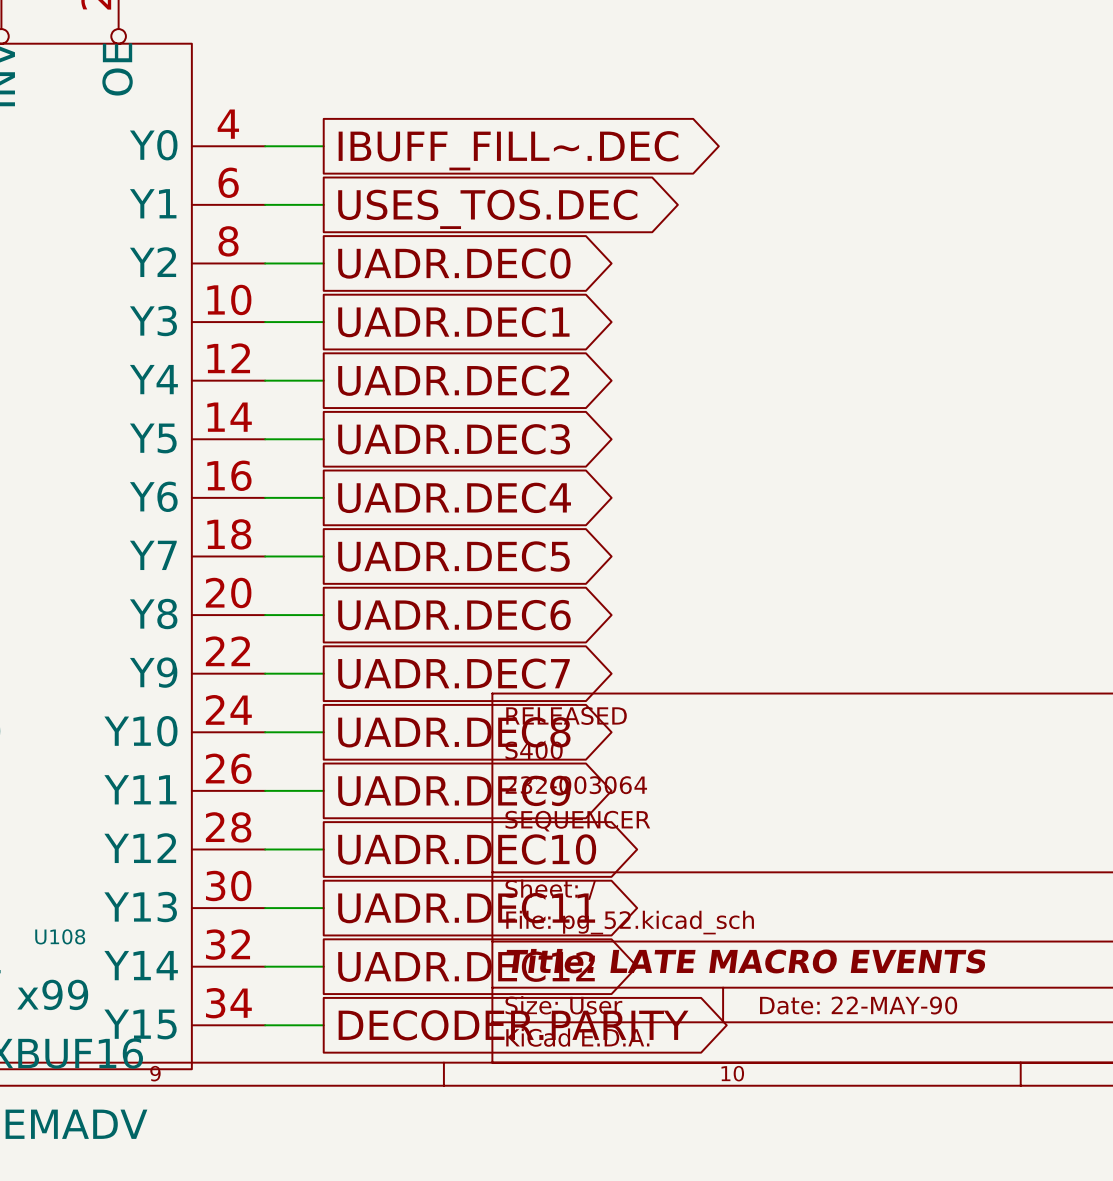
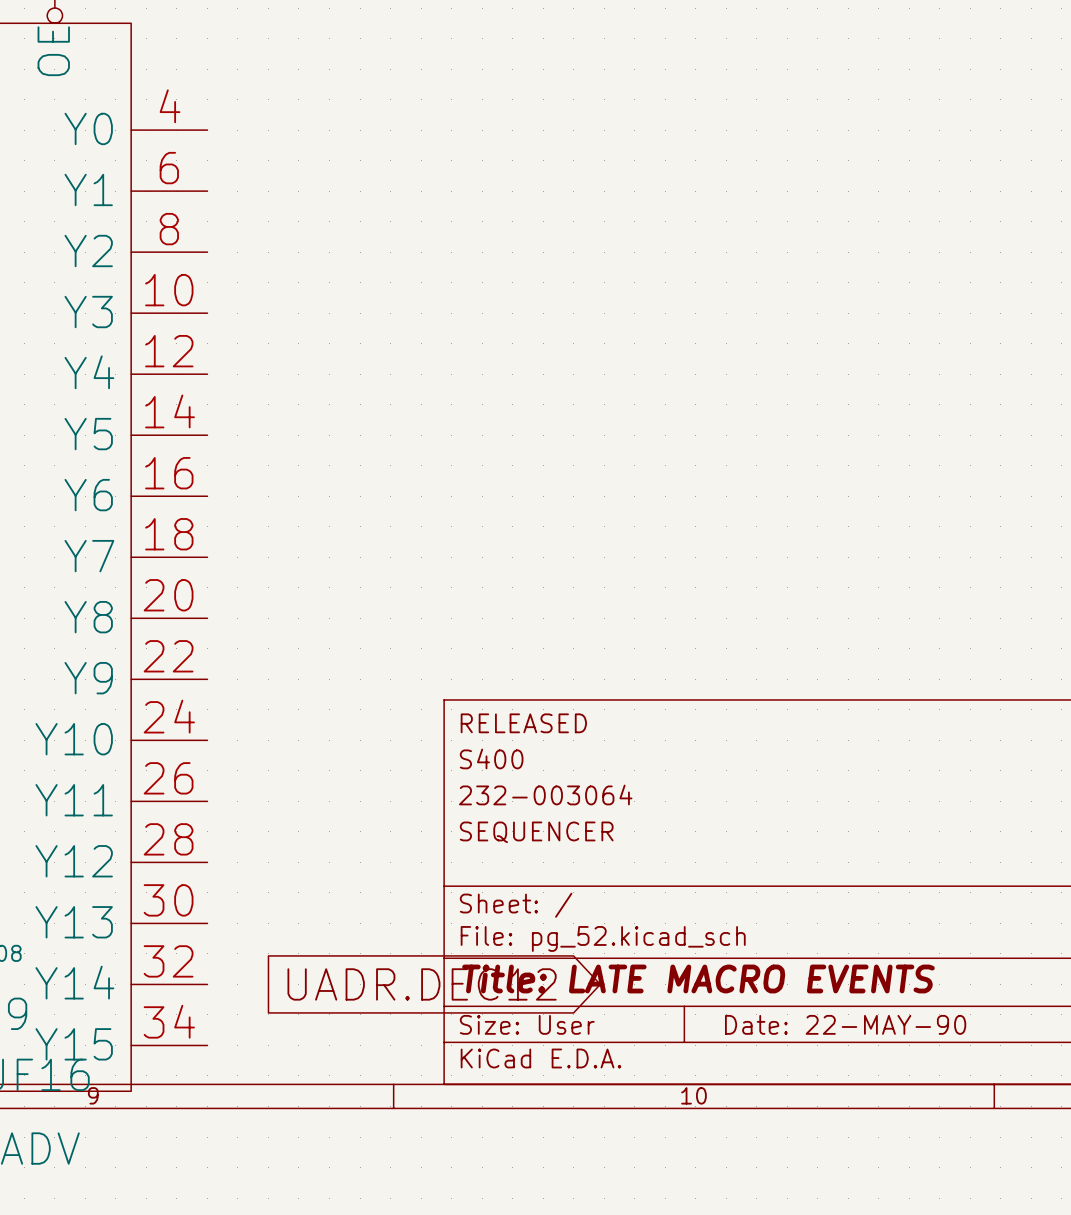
wire: (265, 146) (323, 146) -> none
global label: IBUFF_FILL~.DEC (508, 150) -> none
wire: (265, 204) (323, 204) -> none
global label: USES_TOS.DEC (487, 209) -> none
wire: (265, 263) (323, 263) -> none
global label: UADR.DEC0 (454, 263) -> none
wire: (265, 322) (323, 322) -> none
global label: UADR.DEC1 (453, 322) -> none
wire: (265, 380) (323, 380) -> none
global label: UADR.DEC2 (453, 380) -> none
wire: (265, 439) (323, 439) -> none
global label: UADR.DEC3 (454, 439) -> none
wire: (265, 497) (323, 497) -> none
global label: UADR.DEC4 (454, 497) -> none
wire: (265, 556) (323, 556) -> none
global label: UADR.DEC5 (453, 556) -> none
wire: (265, 615) (323, 615) -> none
global label: UADR.DEC6 (454, 615) -> none
wire: (265, 673) (323, 673) -> none
global label: UADR.DEC7 (454, 673) -> none
wire: (265, 732) (323, 732) -> none
global label: UADR.DEC8 (454, 732) -> none
wire: (265, 790) (323, 790) -> none
global label: UADR.DEC9 (454, 790) -> none
wire: (265, 849) (323, 849) -> none
global label: UADR.DEC10 (467, 849) -> none
wire: (265, 908) (323, 908) -> none
global label: UADR.DEC11 (466, 908) -> none
wire: (265, 966) (323, 966) -> none
wire: (265, 1025) (323, 1025) -> none
global label: DECODER.PARITY (513, 1025) -> none

